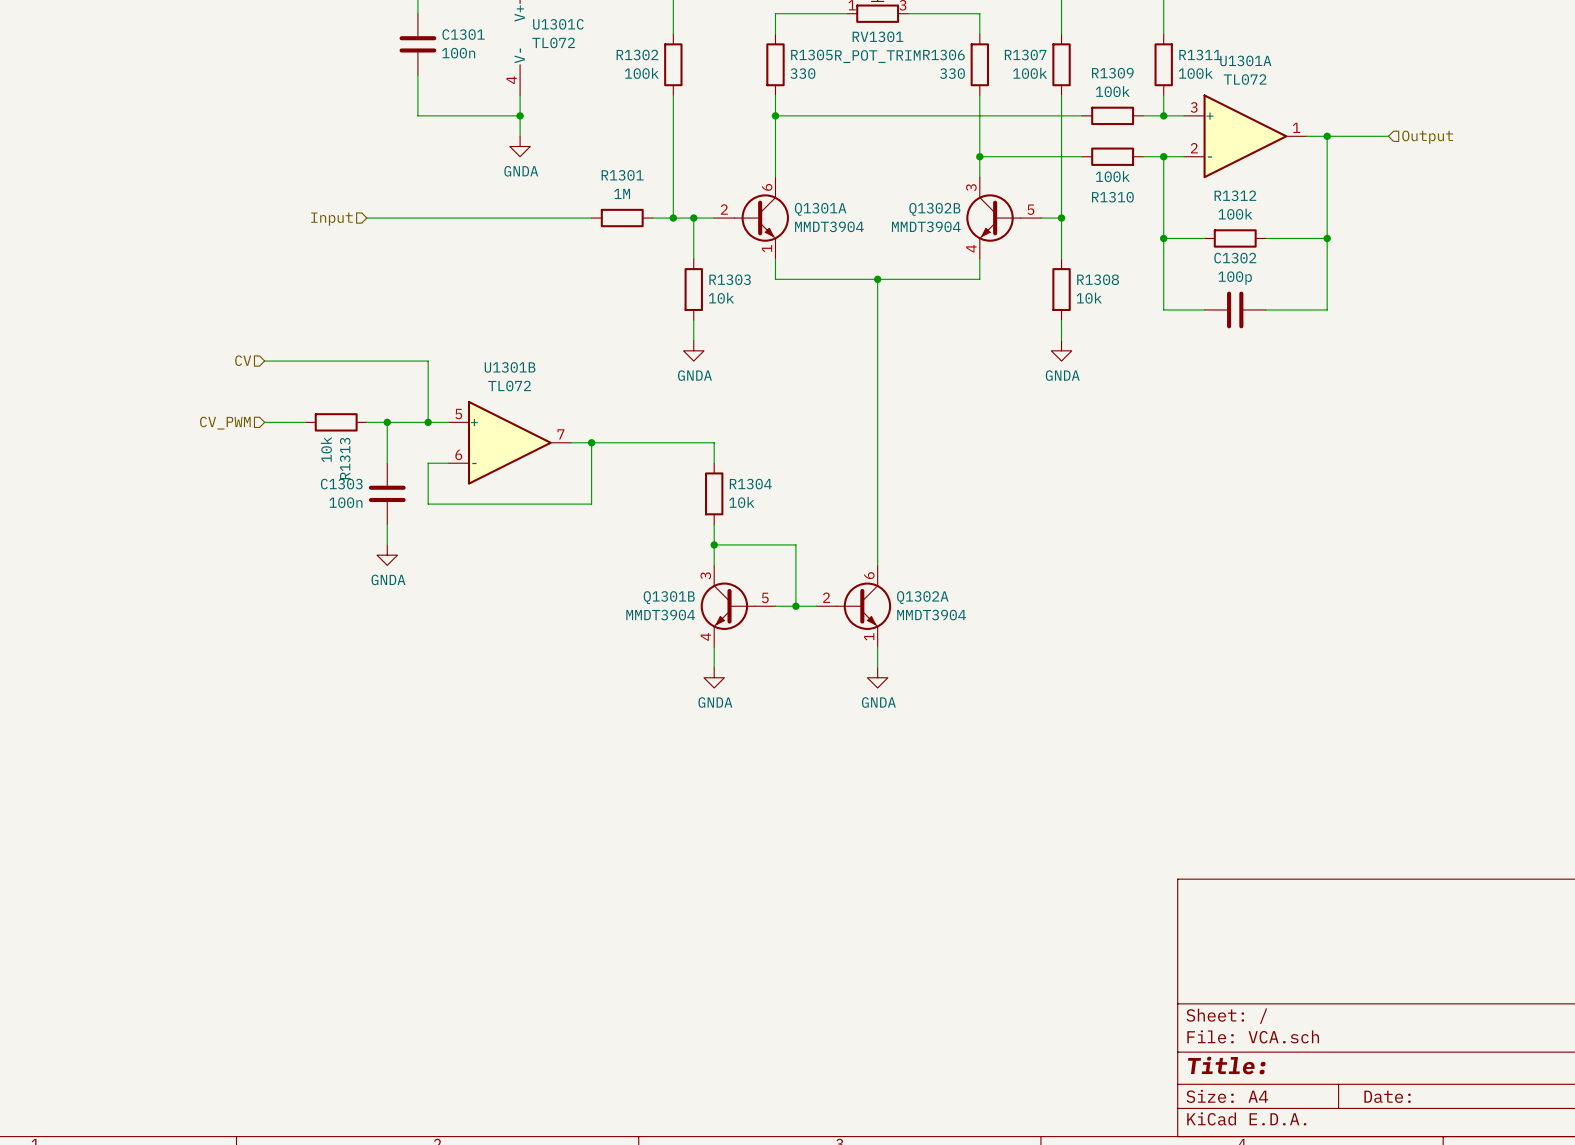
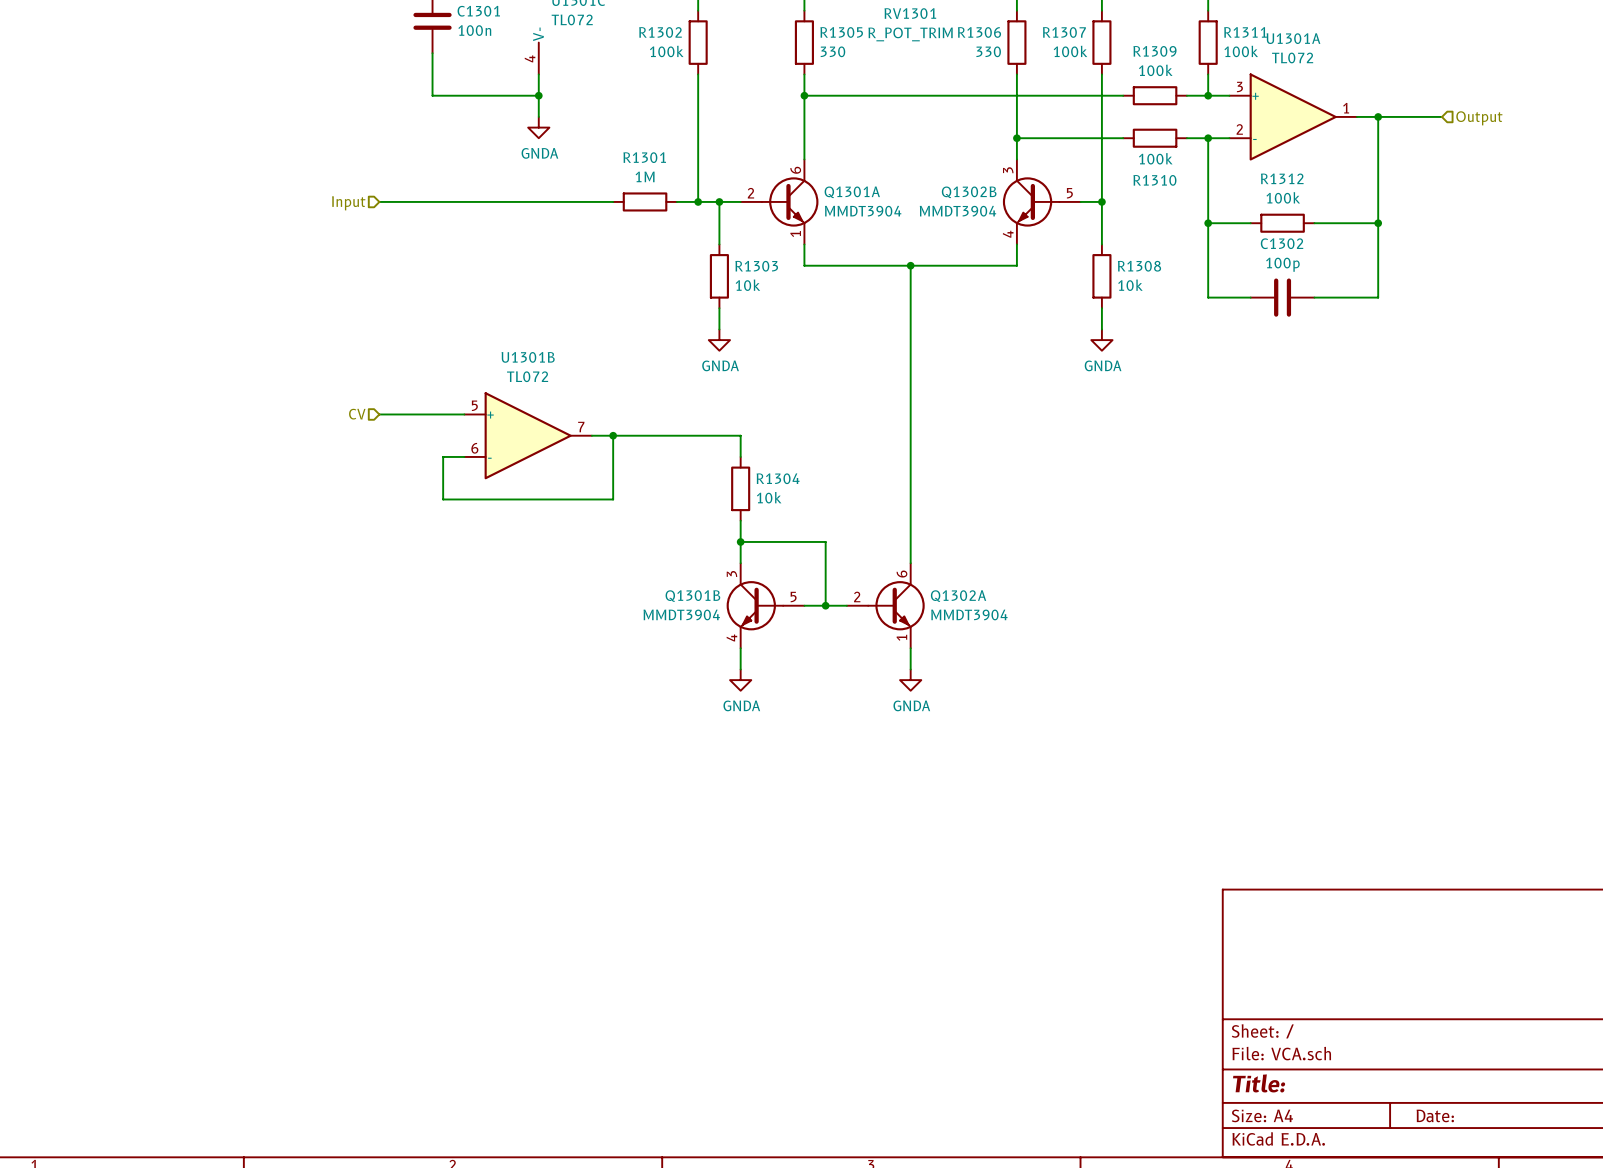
hierarchical label position: CV (243, 360) -> CV (357, 414)
wire: (264, 361) (428, 361) (428, 422) -> none
wire: (264, 422) (305, 422) -> none
R1313: 10k (336, 422) -> none
wire: (387, 422) (387, 463) -> none
junction: (387, 422) -> none
junction: (428, 422) -> none
hierarchical label: CV_PWM (225, 423) -> none
C1303: 100n (387, 493) -> none
wire: (387, 524) (387, 544) -> none
power symbol: GNDA (387, 555) -> none

